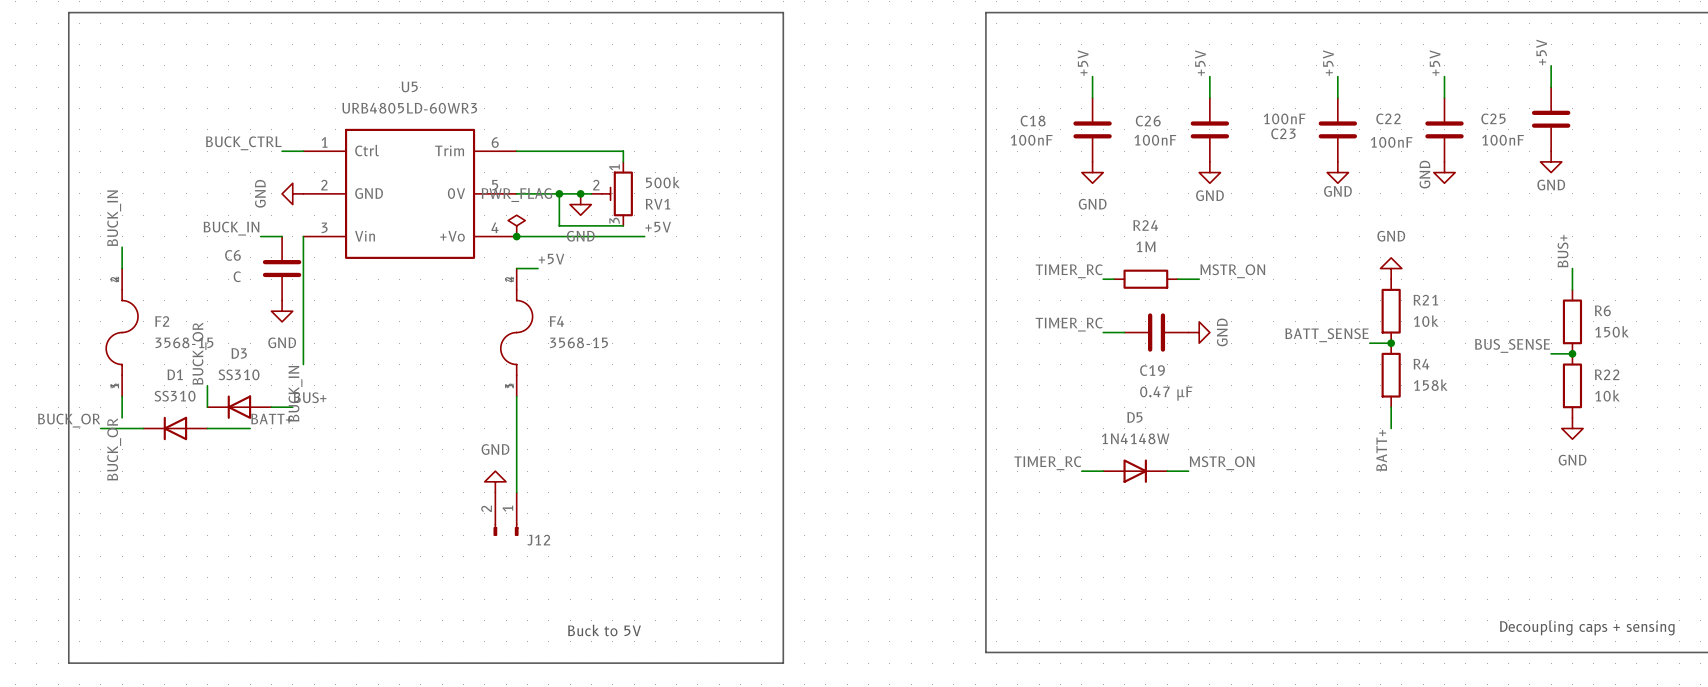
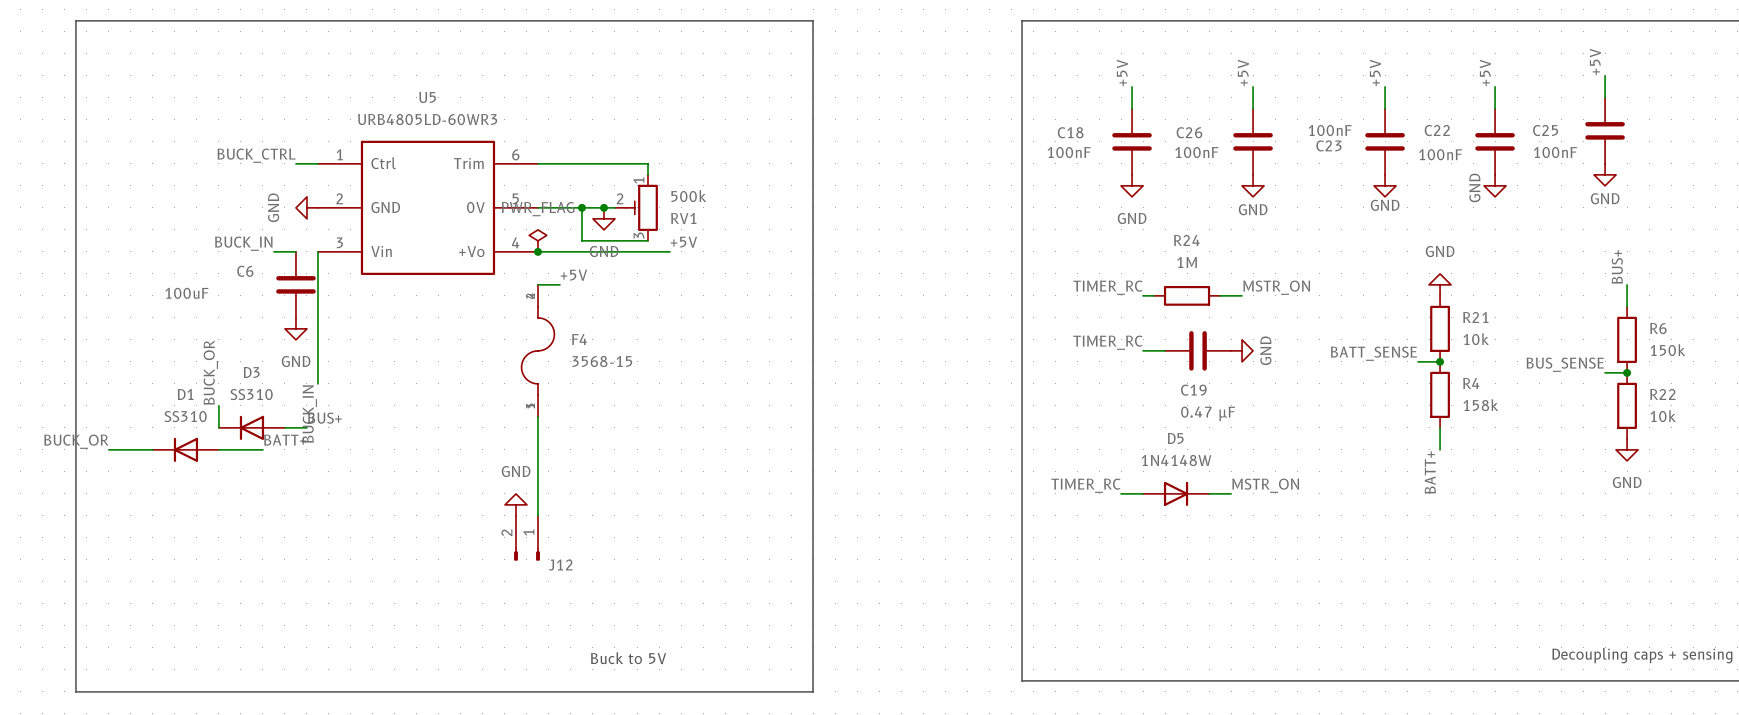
label: BUCK_IN (114, 218) -> none
wire: (122, 247) (122, 268) -> none
C6 value: C (237, 276) -> 100uF (186, 293)
F2: 3568-15 (122, 332) -> none
wire: (122, 396) (122, 417) -> none
label: BUCK_OR (114, 449) -> none

